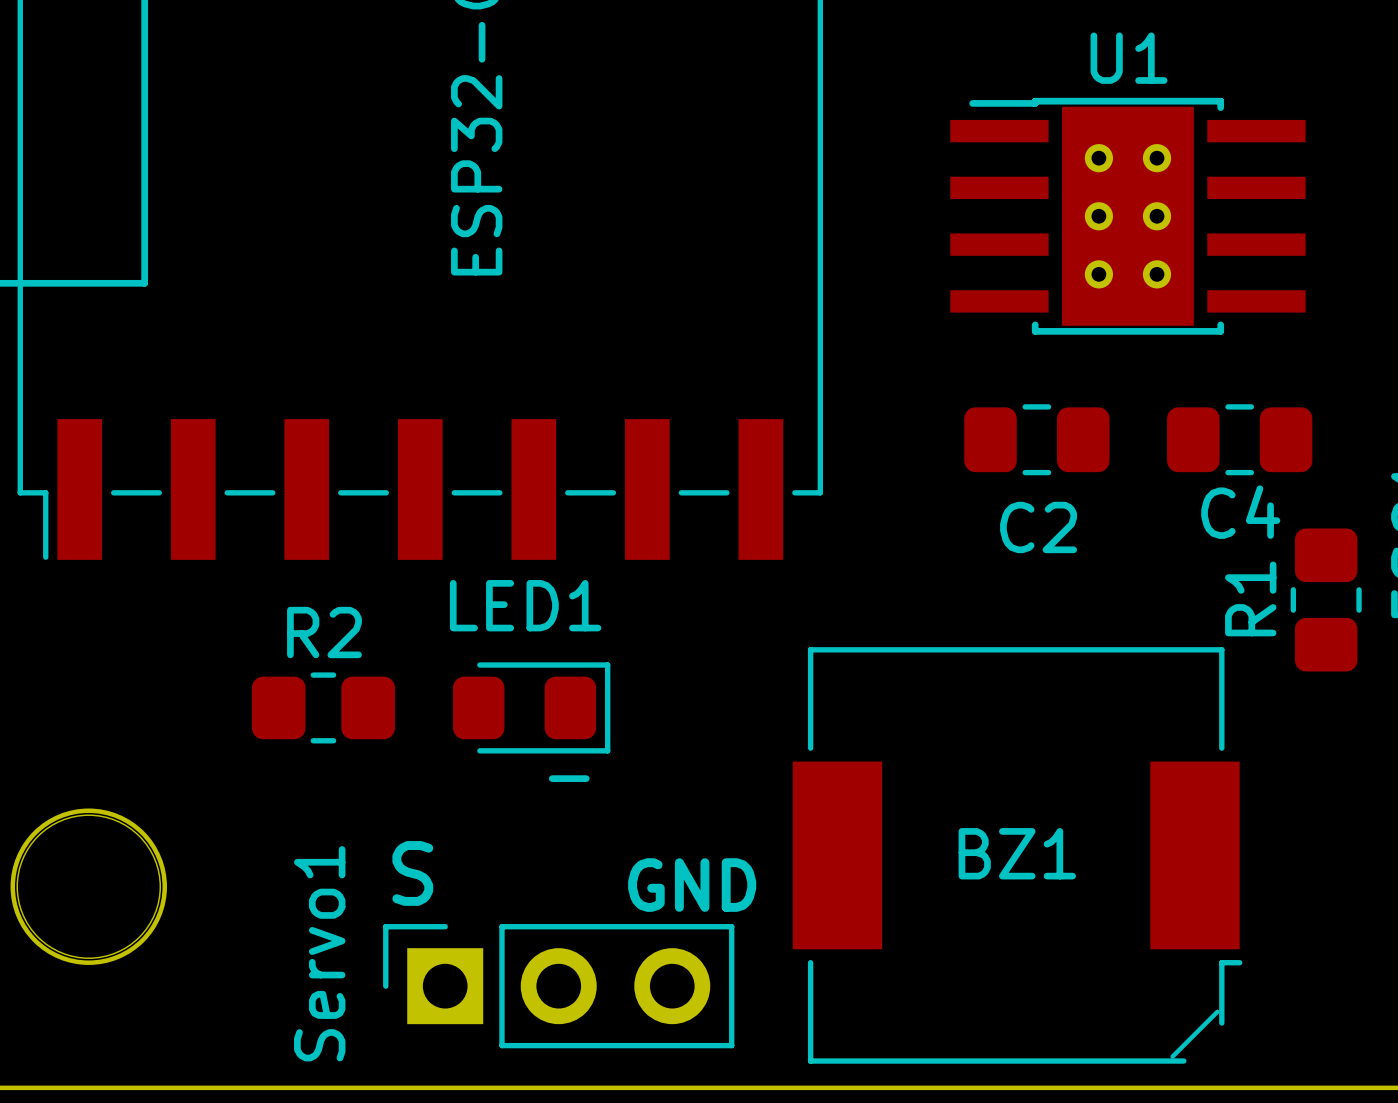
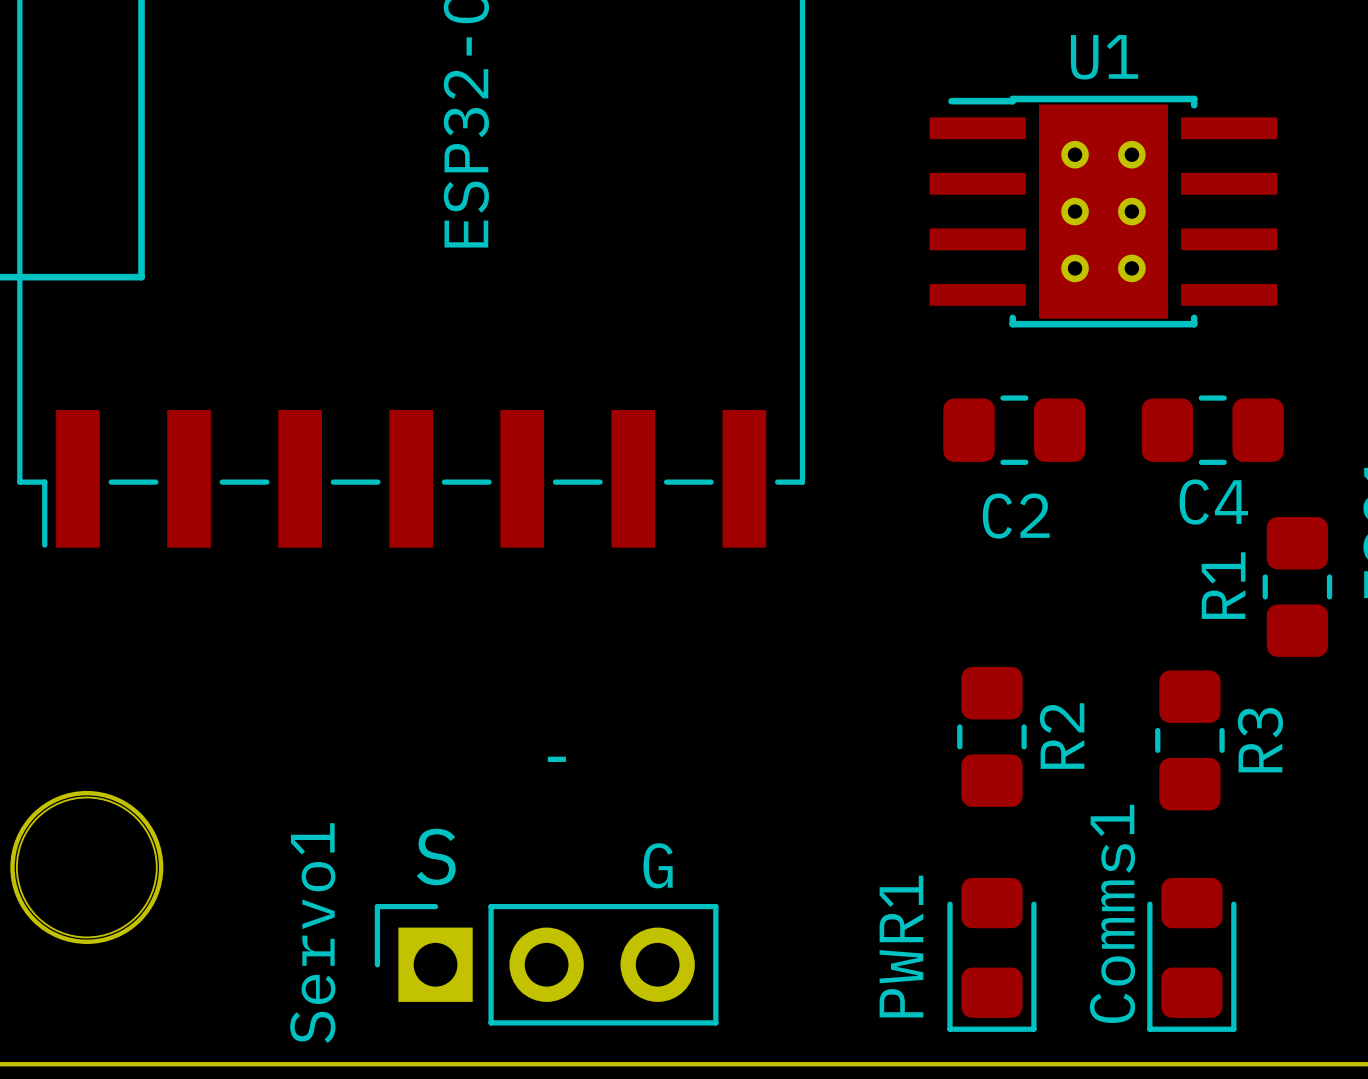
R2 rotation: 0° (323, 707) -> 90° clockwise (991, 736)
R2 position: (323, 707) -> (991, 736)
LED1: (531, 707) -> none
R3: none -> (1189, 740)
BZ1: (1017, 855) -> none
text position: S (412, 873) -> S (436, 857)
text: GND (692, 885) -> G (658, 865)
PWR1: none -> (991, 954)
Comms1: none -> (1191, 954)

